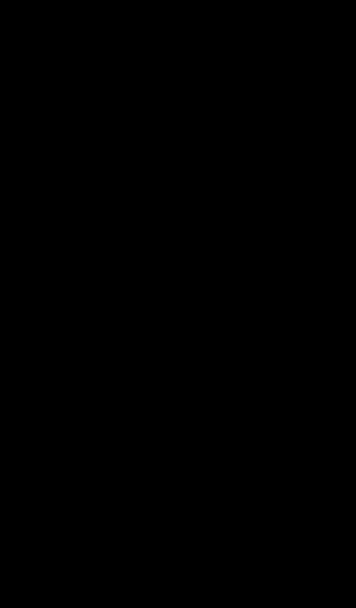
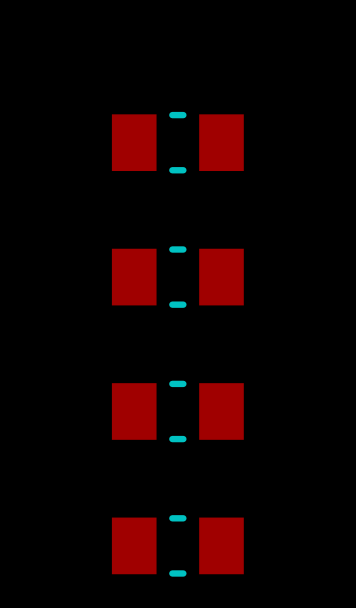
part: none -> (177, 142)
part: none -> (177, 277)
part: none -> (177, 411)
part: none -> (177, 545)

